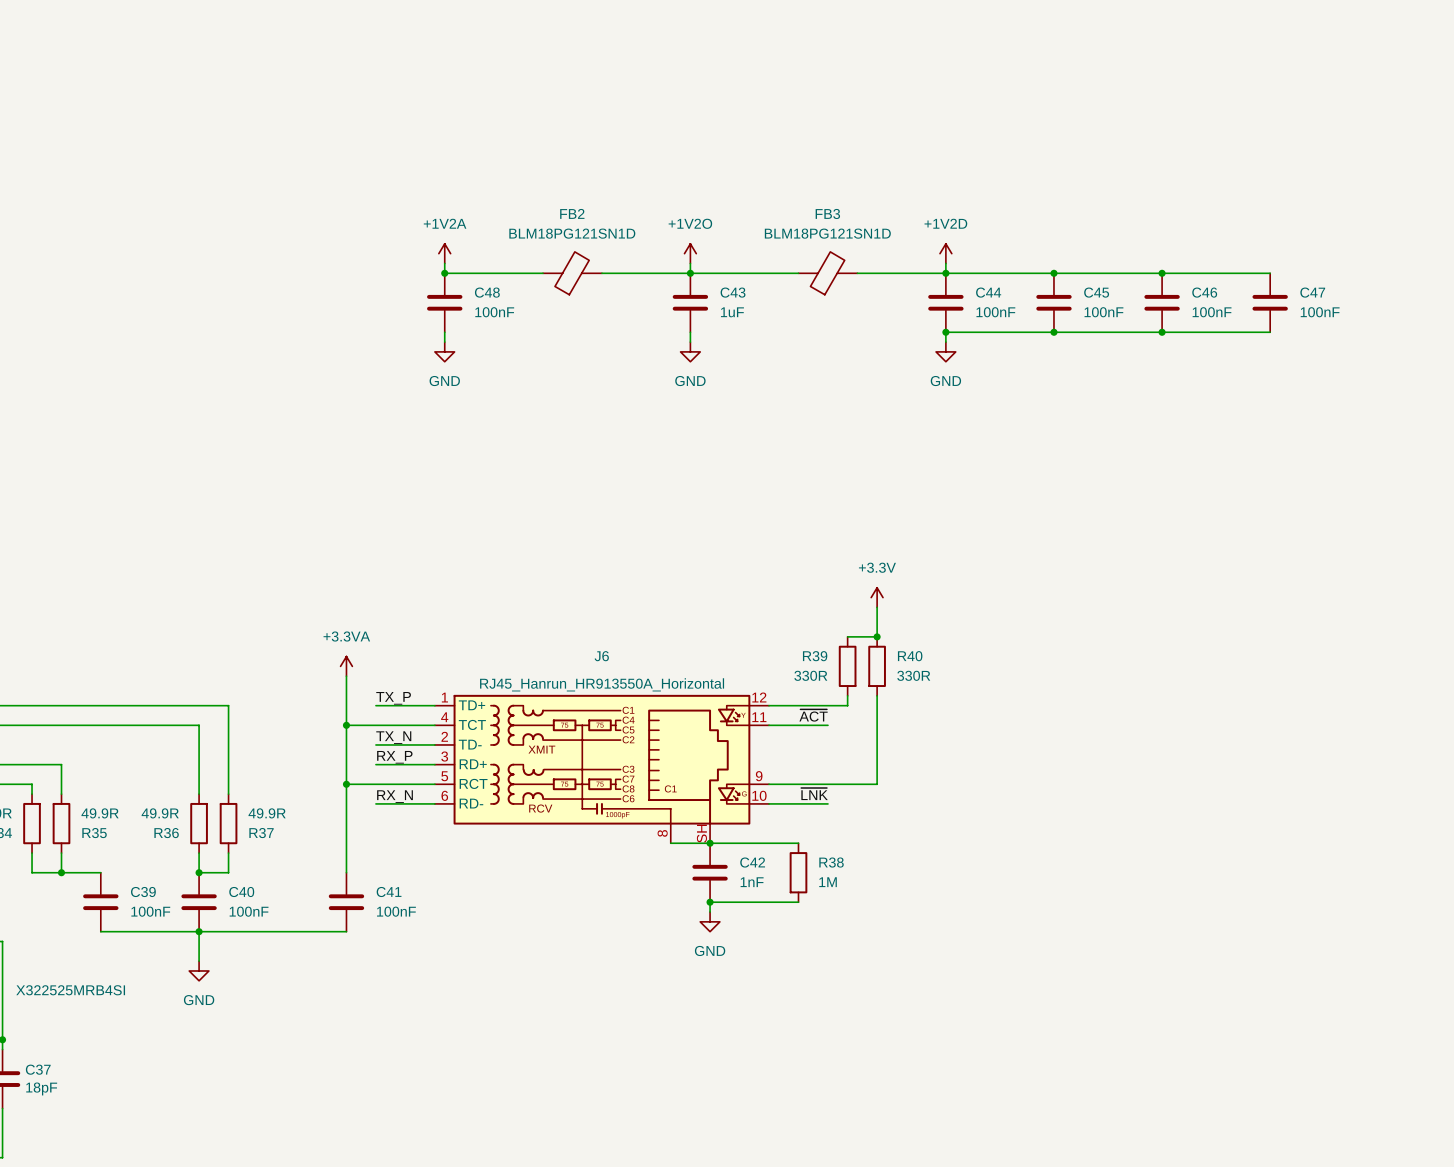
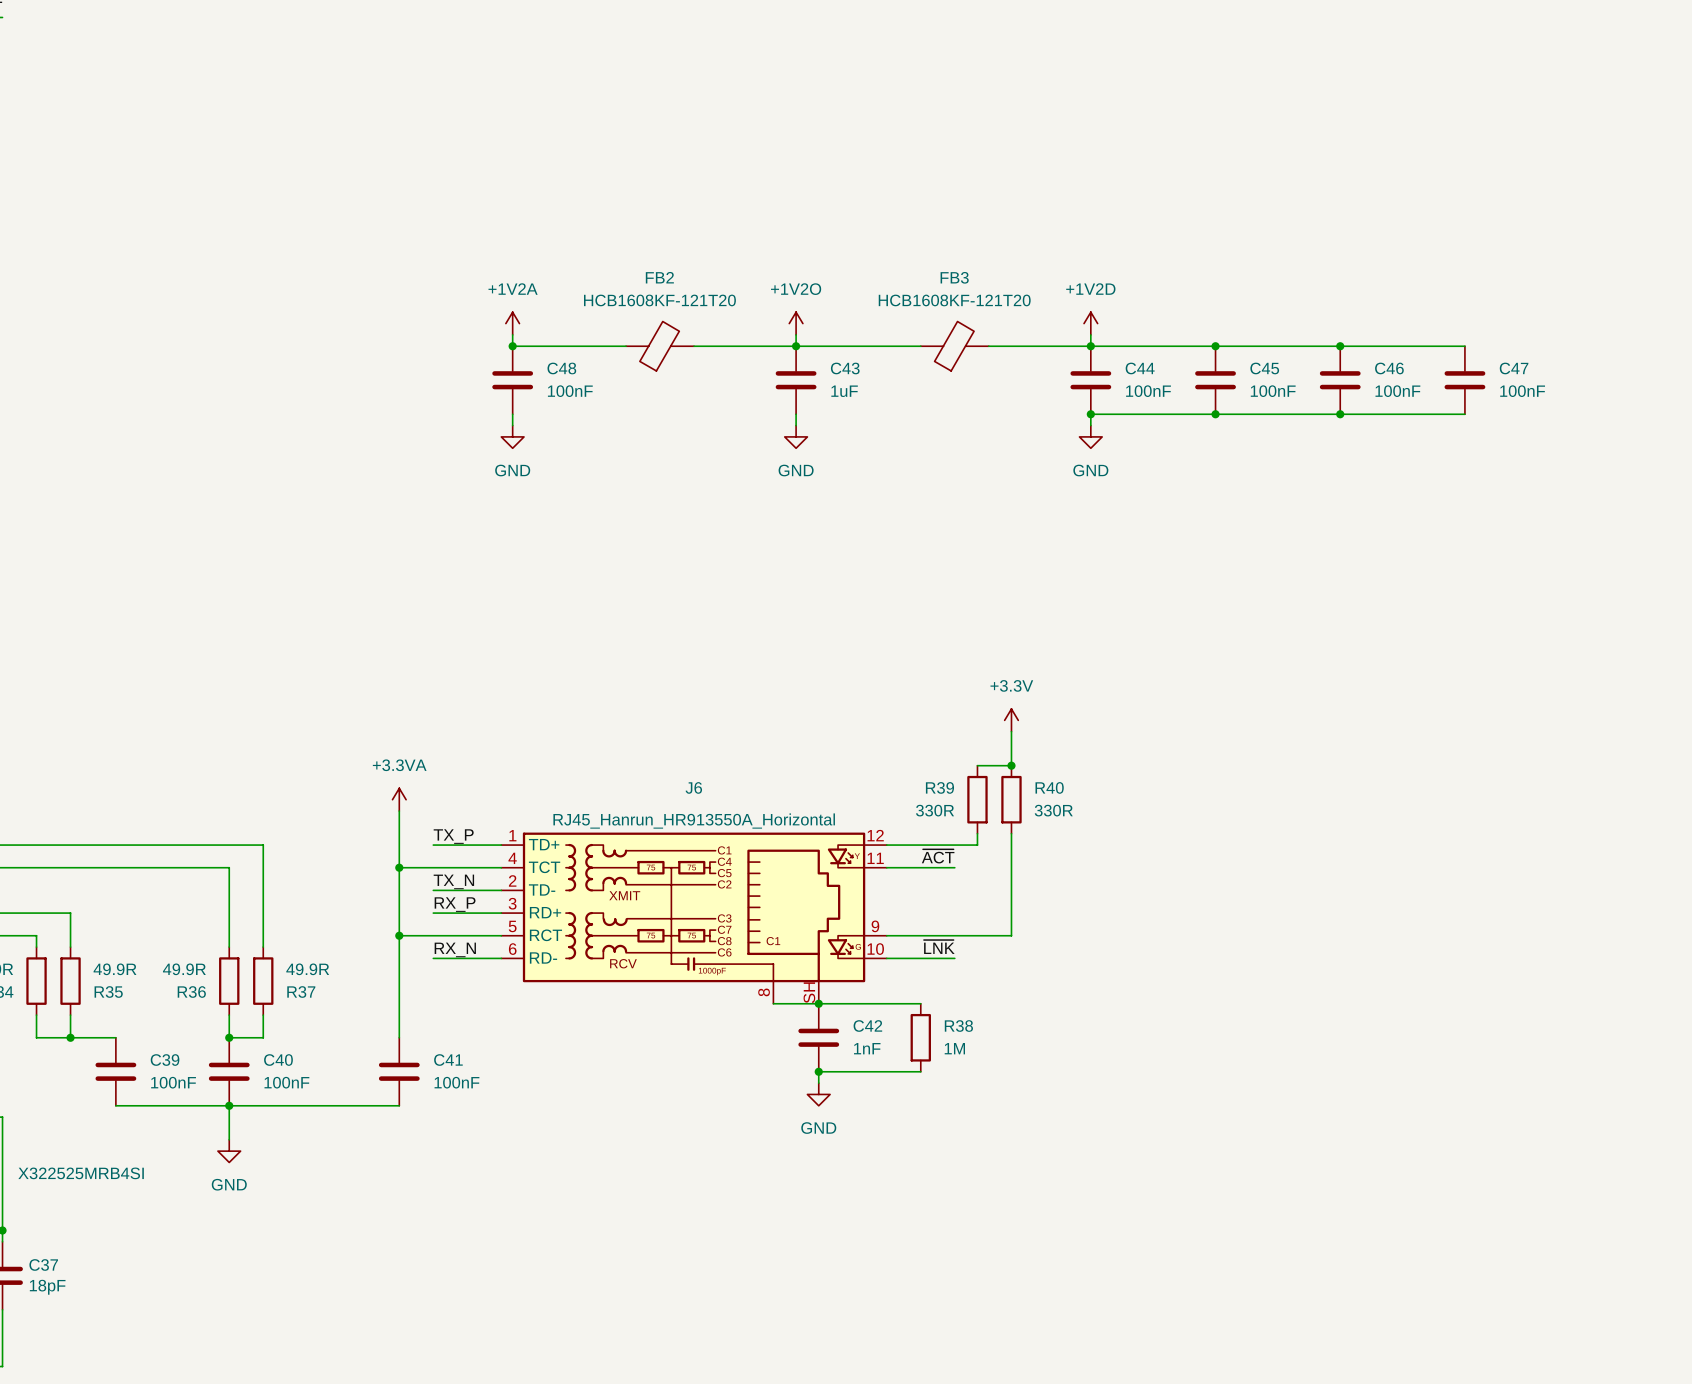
FB2 value: BLM18PG121SN1D (572, 233) -> HCB1608KF-121T20 (659, 300)
FB3 value: BLM18PG121SN1D (827, 233) -> HCB1608KF-121T20 (954, 300)

